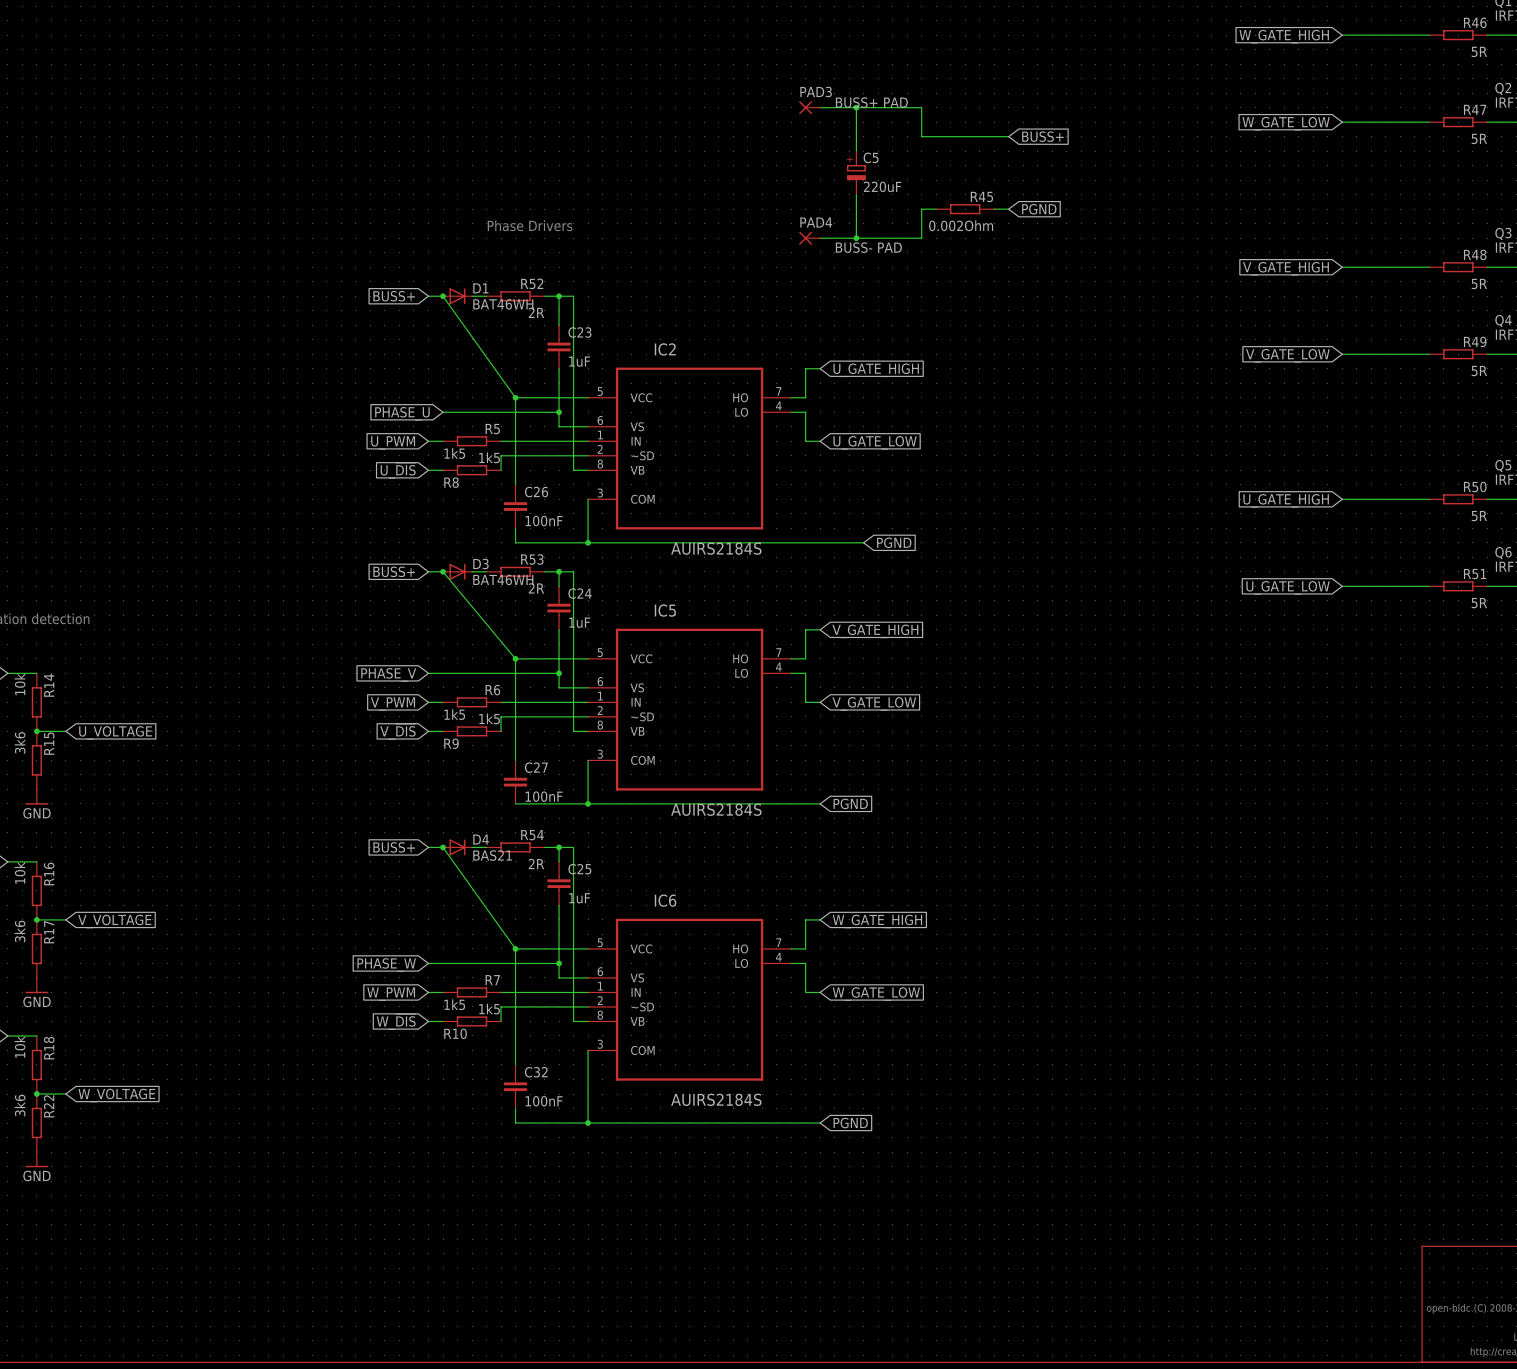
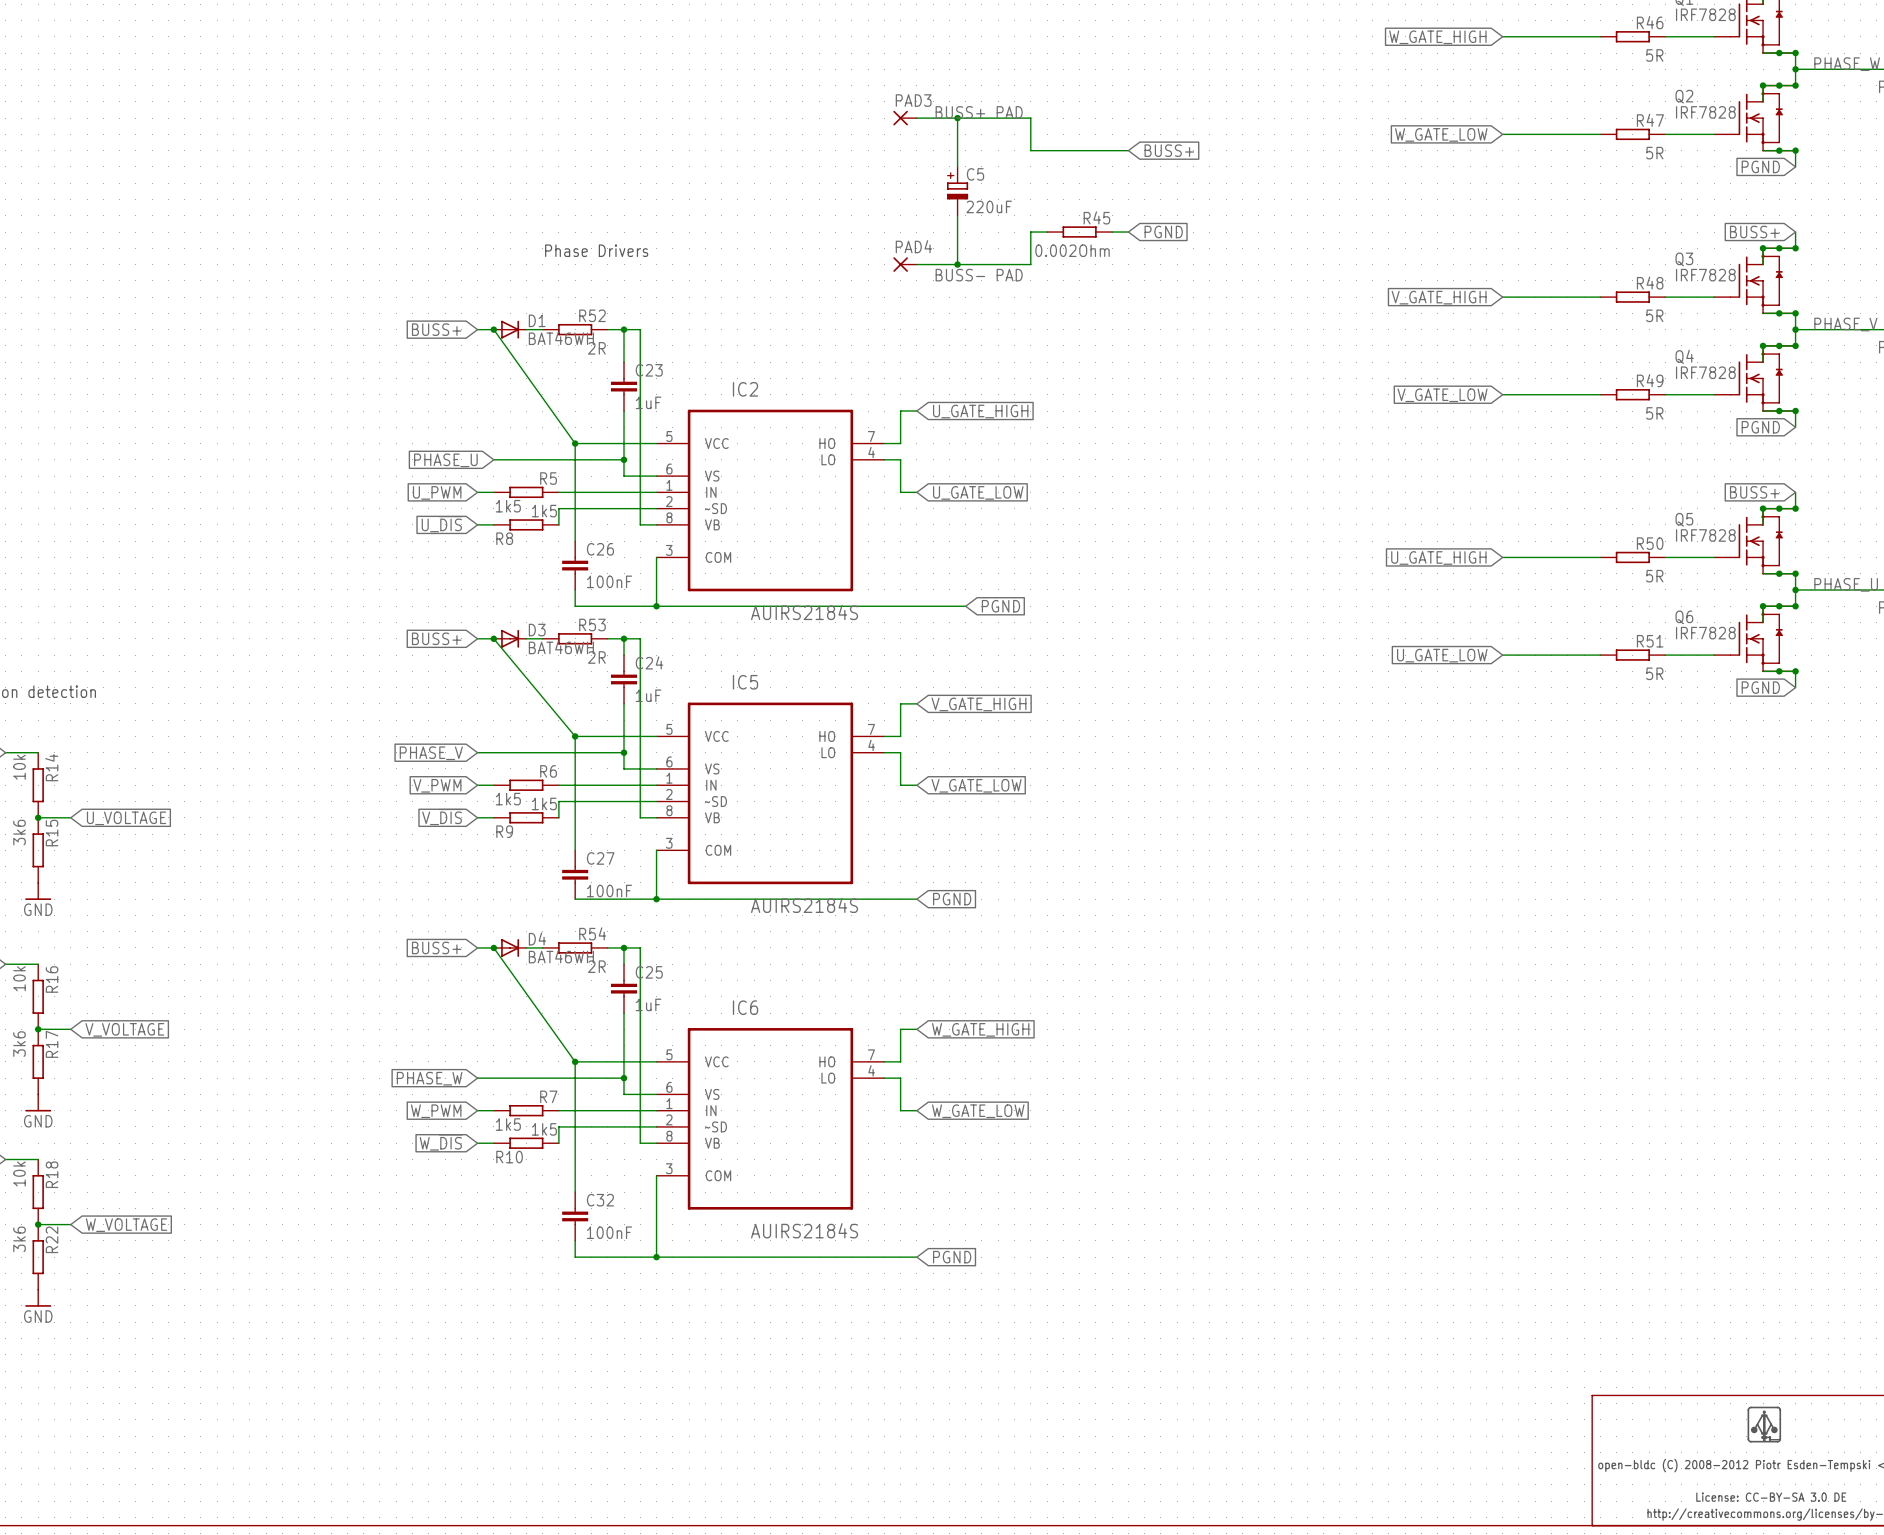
D4 value: BAS21 (492, 855) -> BAT46WH (561, 956)

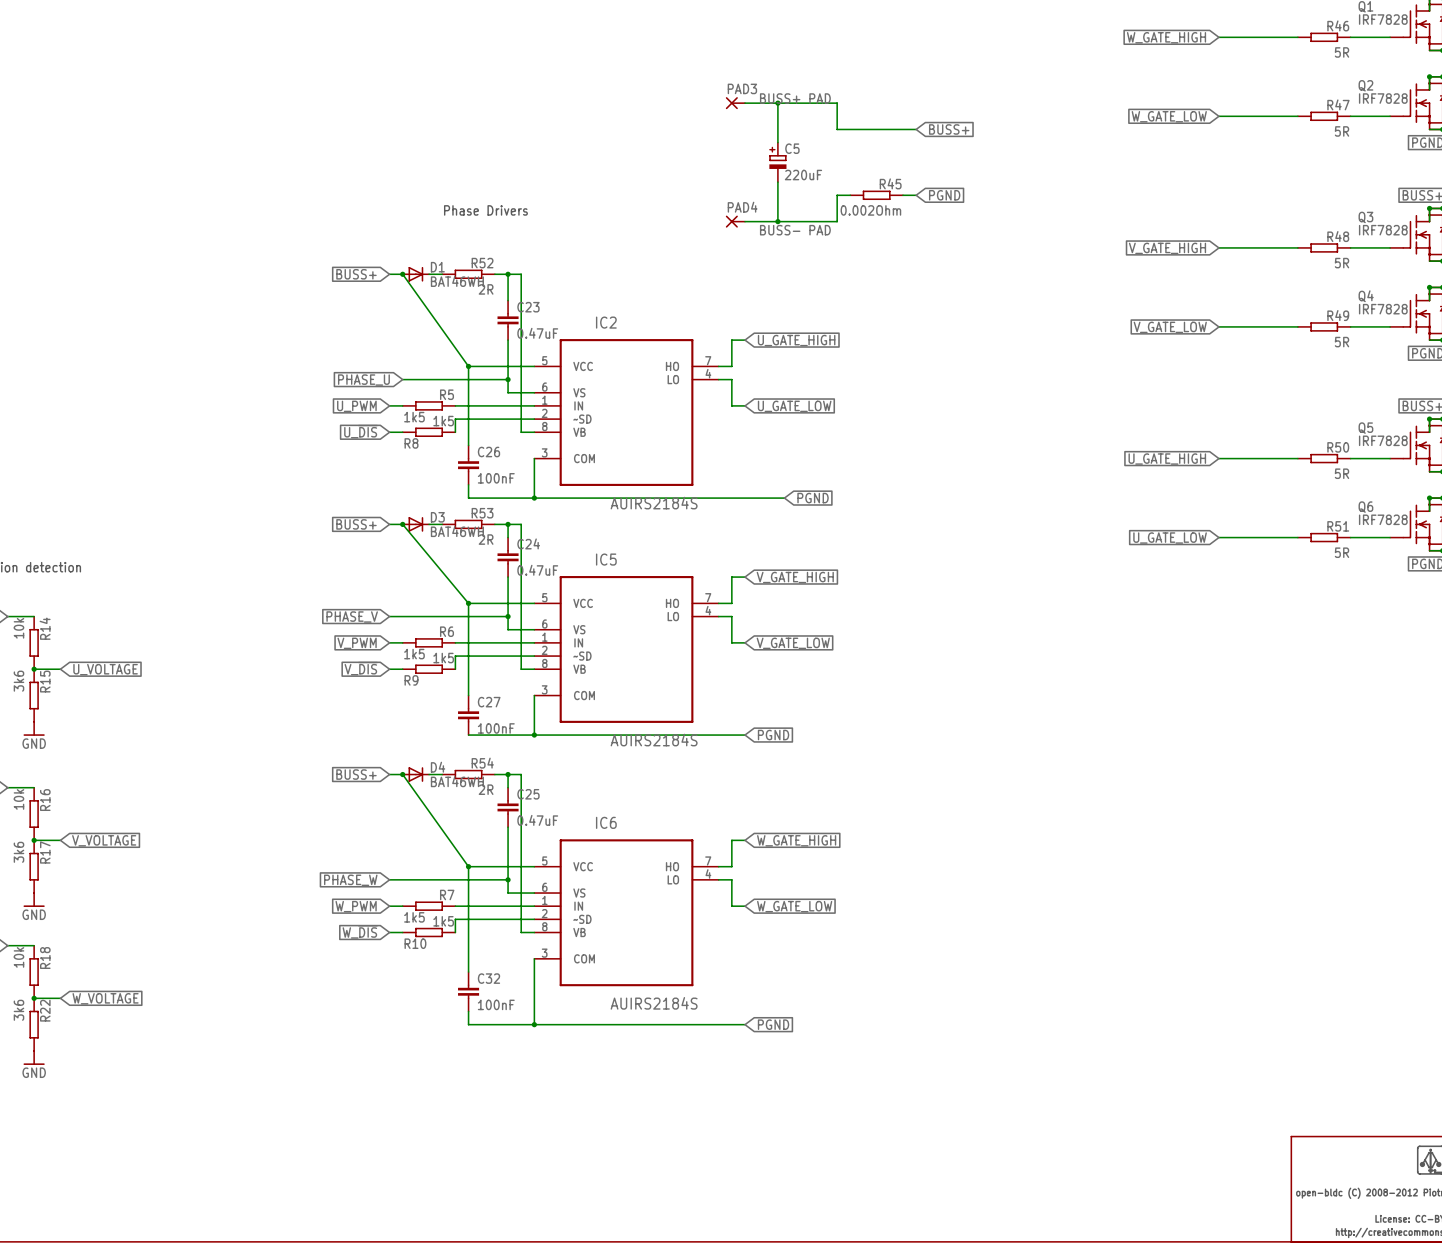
C23 value: 1uF (648, 402) -> 0.47uF (537, 333)
C24 value: 1uF (648, 695) -> 0.47uF (537, 570)
C25 value: 1uF (648, 1004) -> 0.47uF (537, 820)

